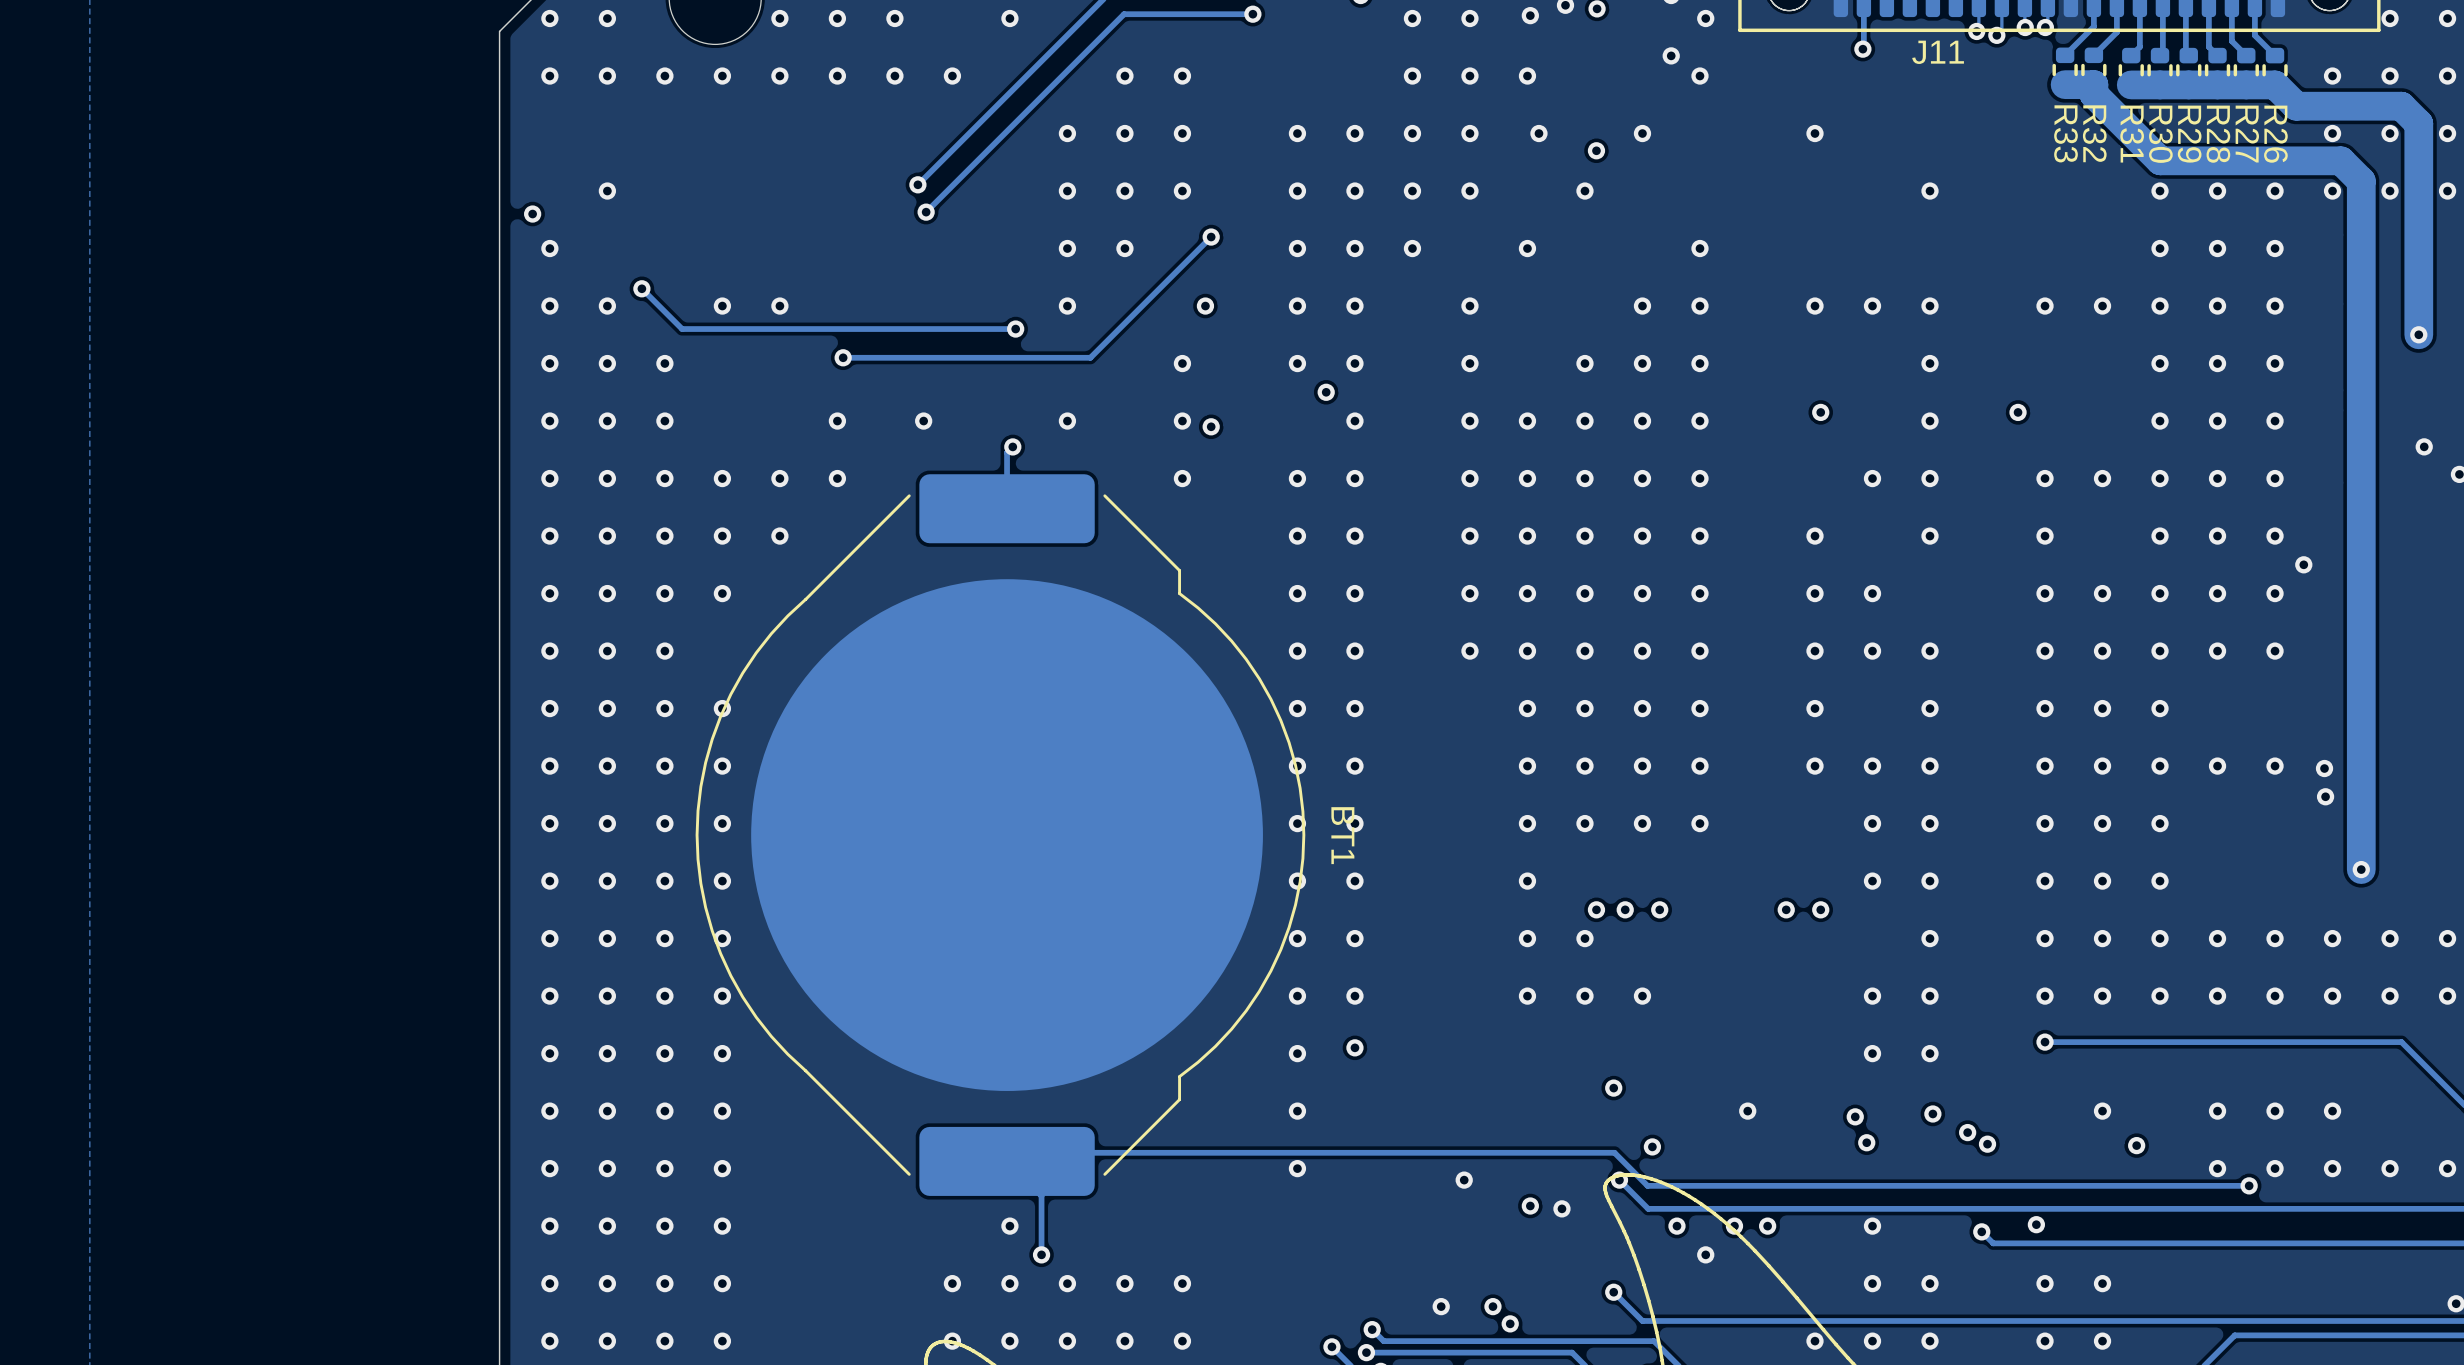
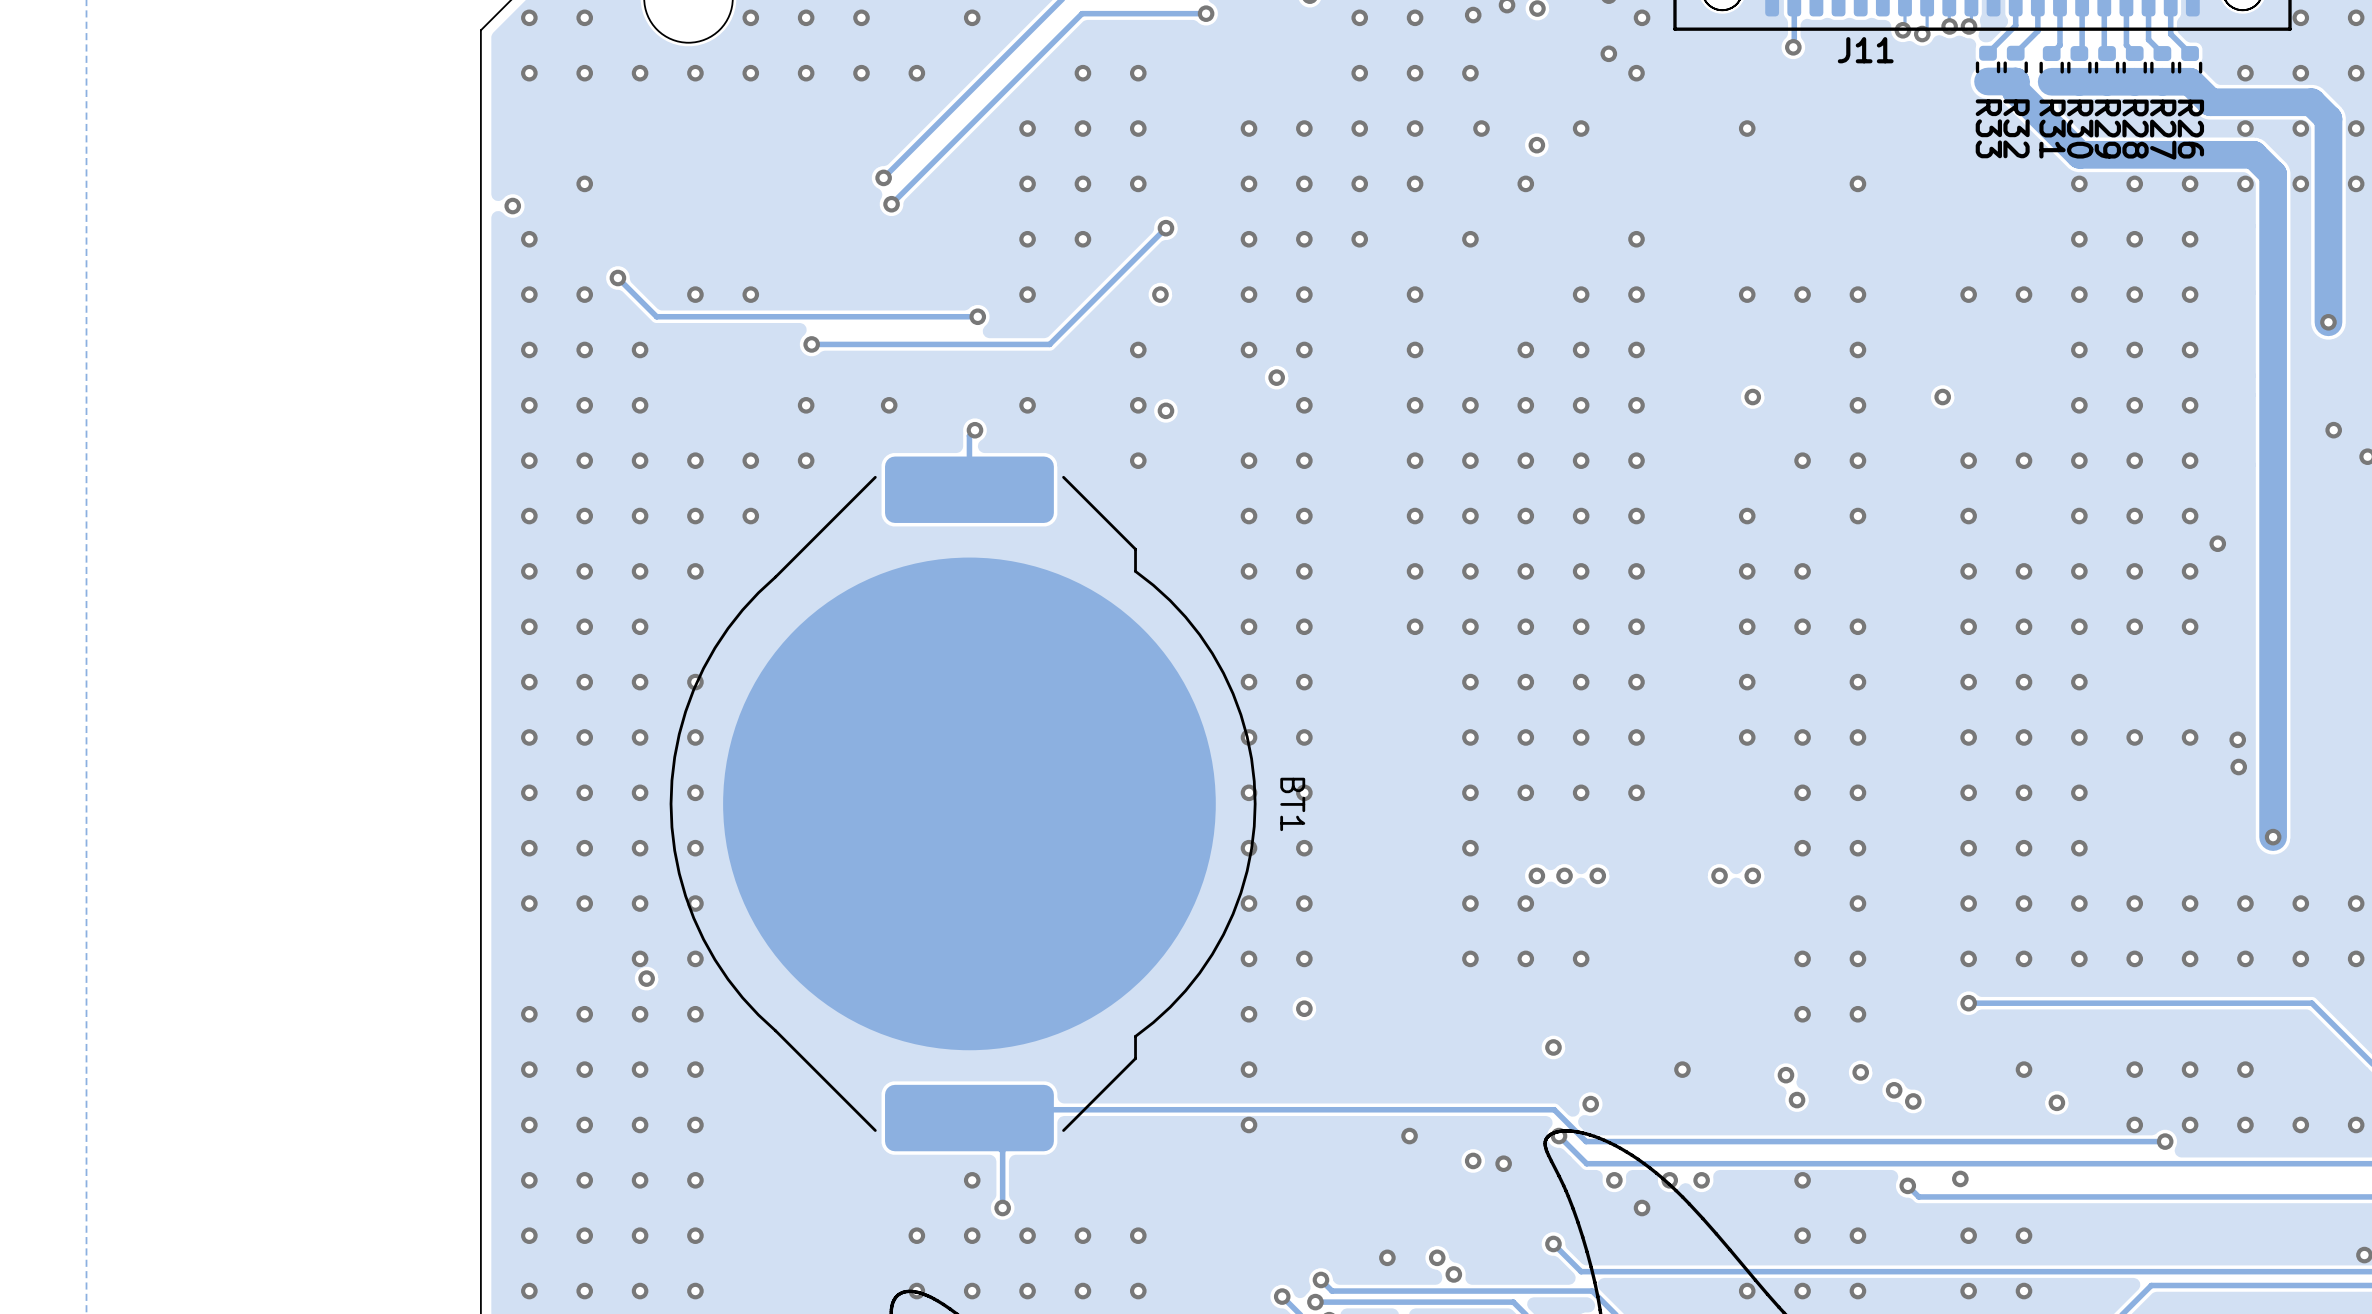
via: (549, 996) -> none
via: (607, 996) -> none
via: none -> (646, 978)

